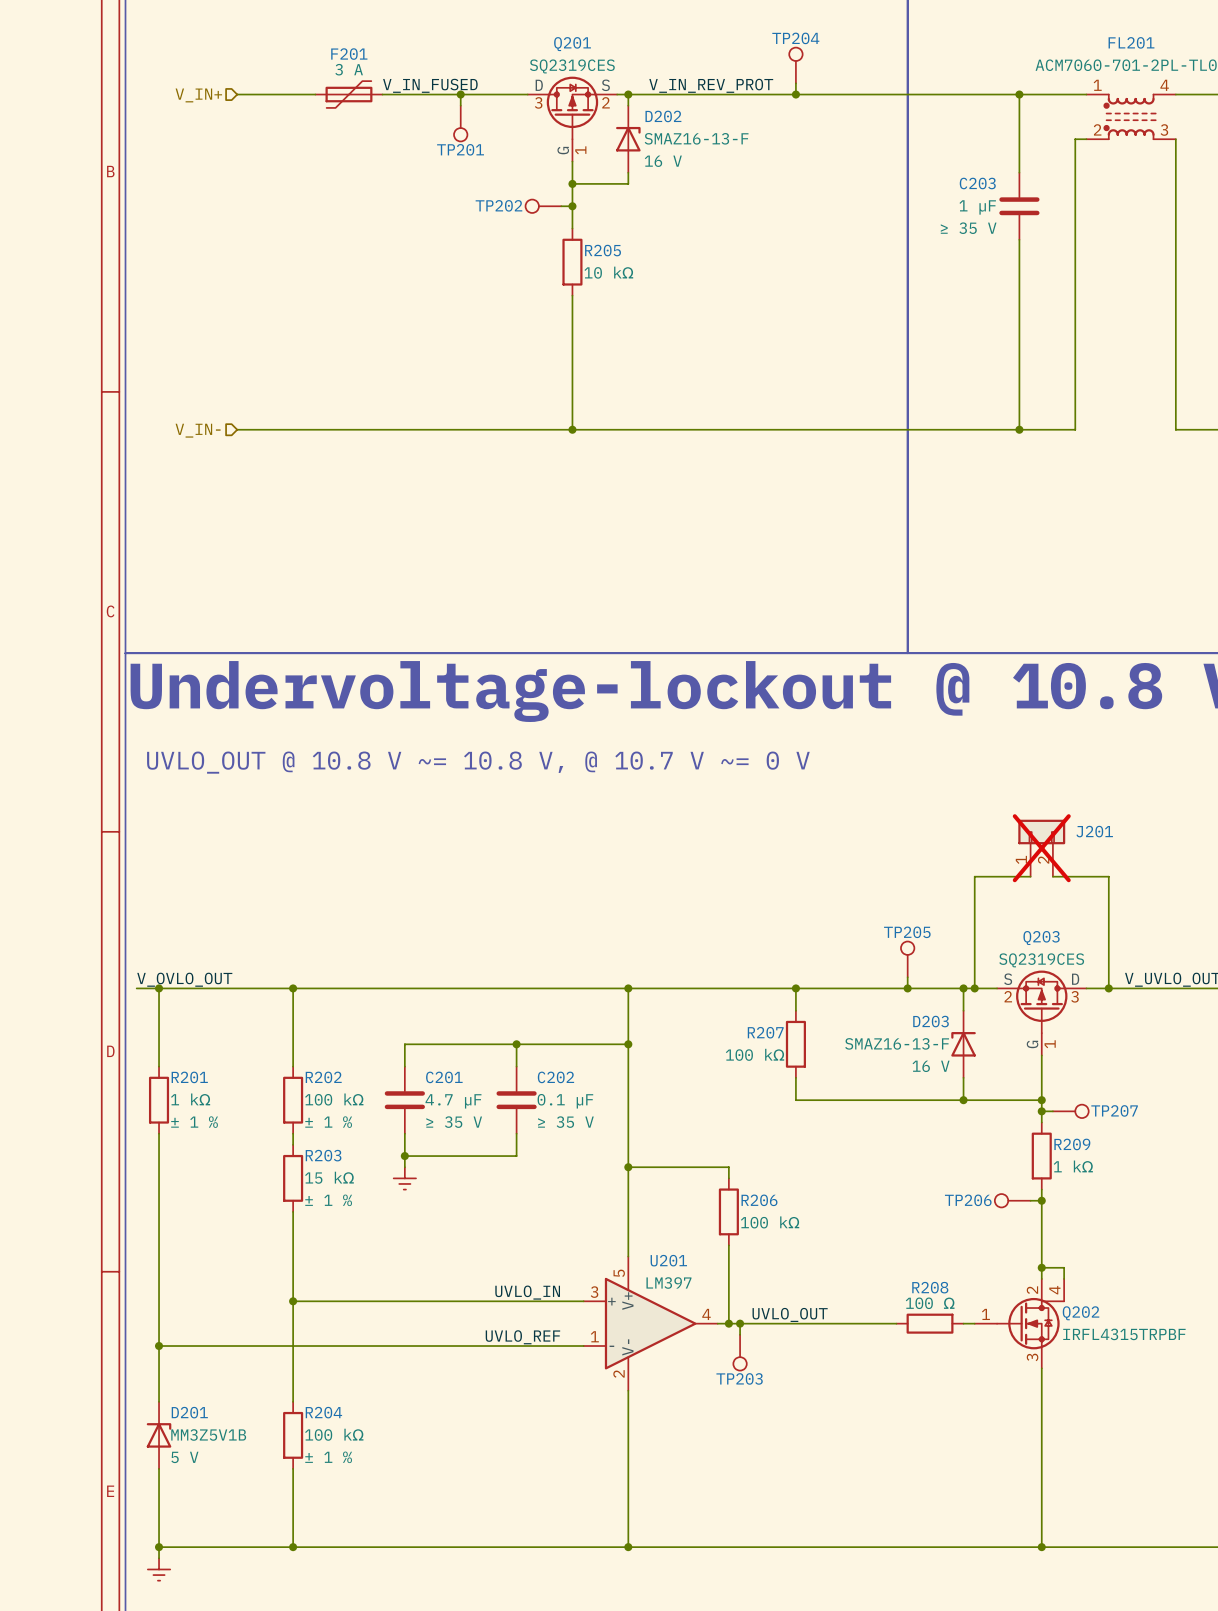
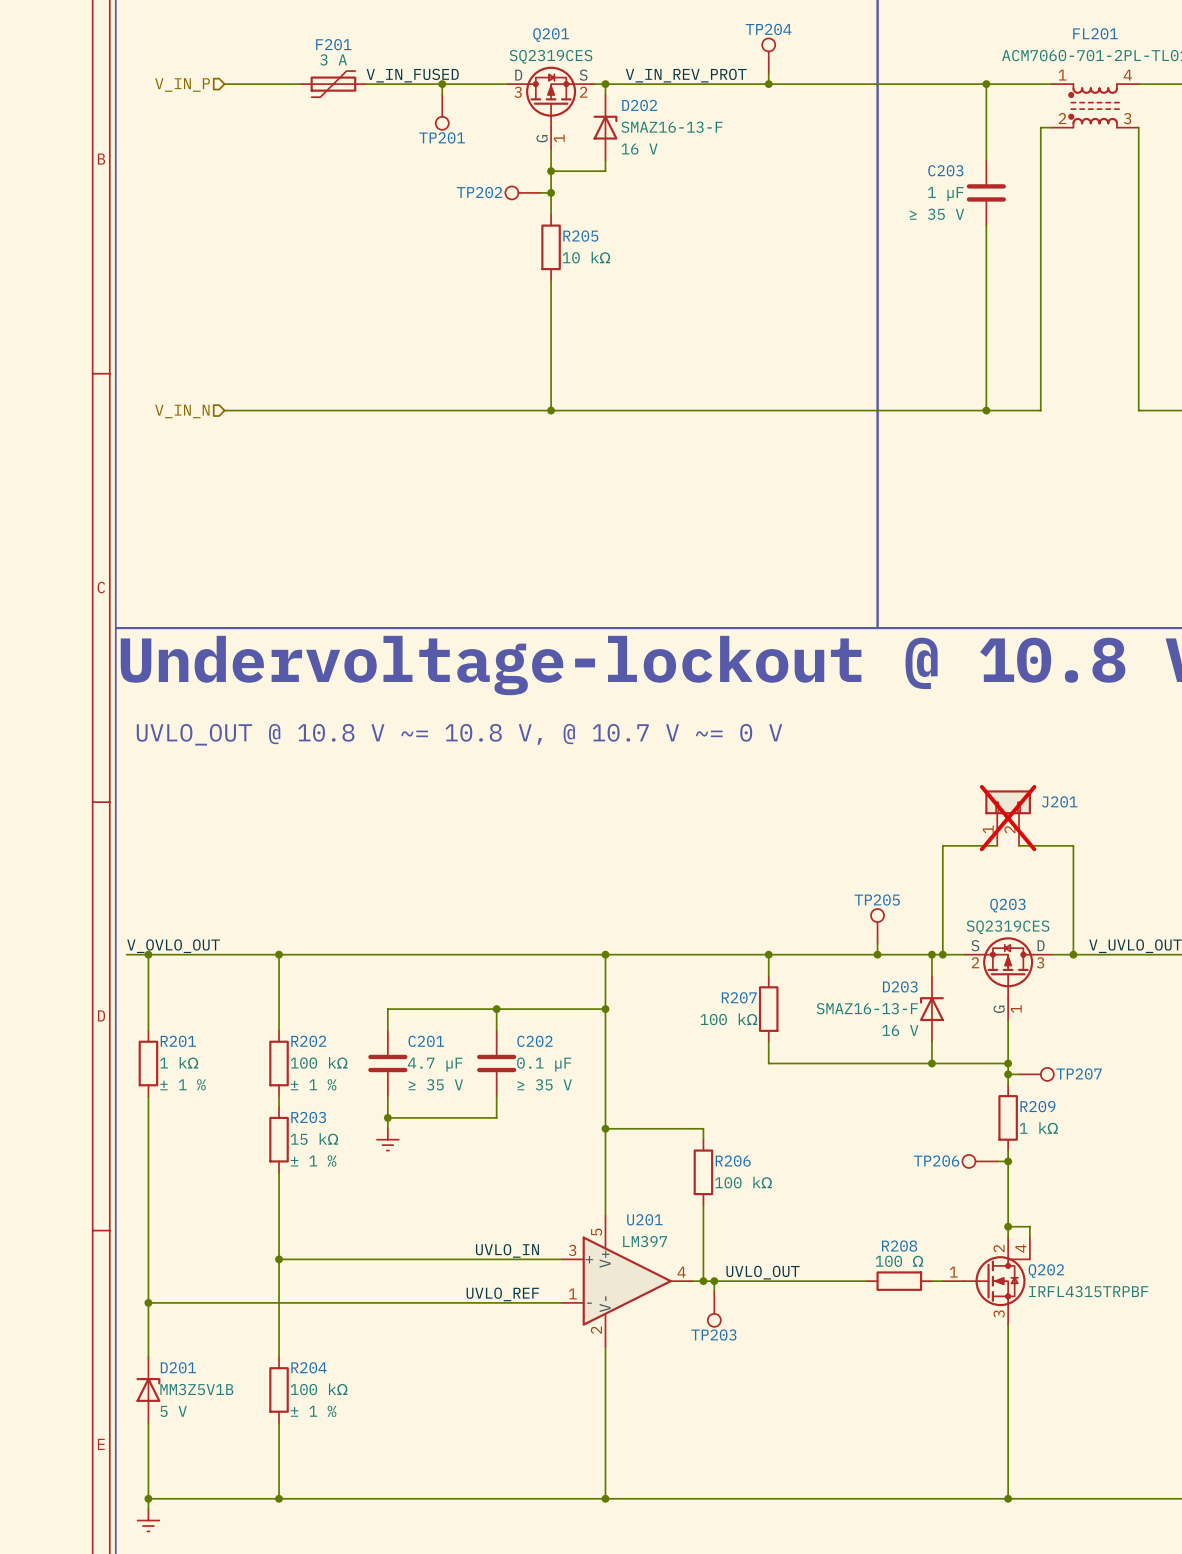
hierarchical label: V_IN+ (198, 95) -> V_IN_P (182, 85)
hierarchical label: V_IN- (198, 430) -> V_IN_N (182, 411)

